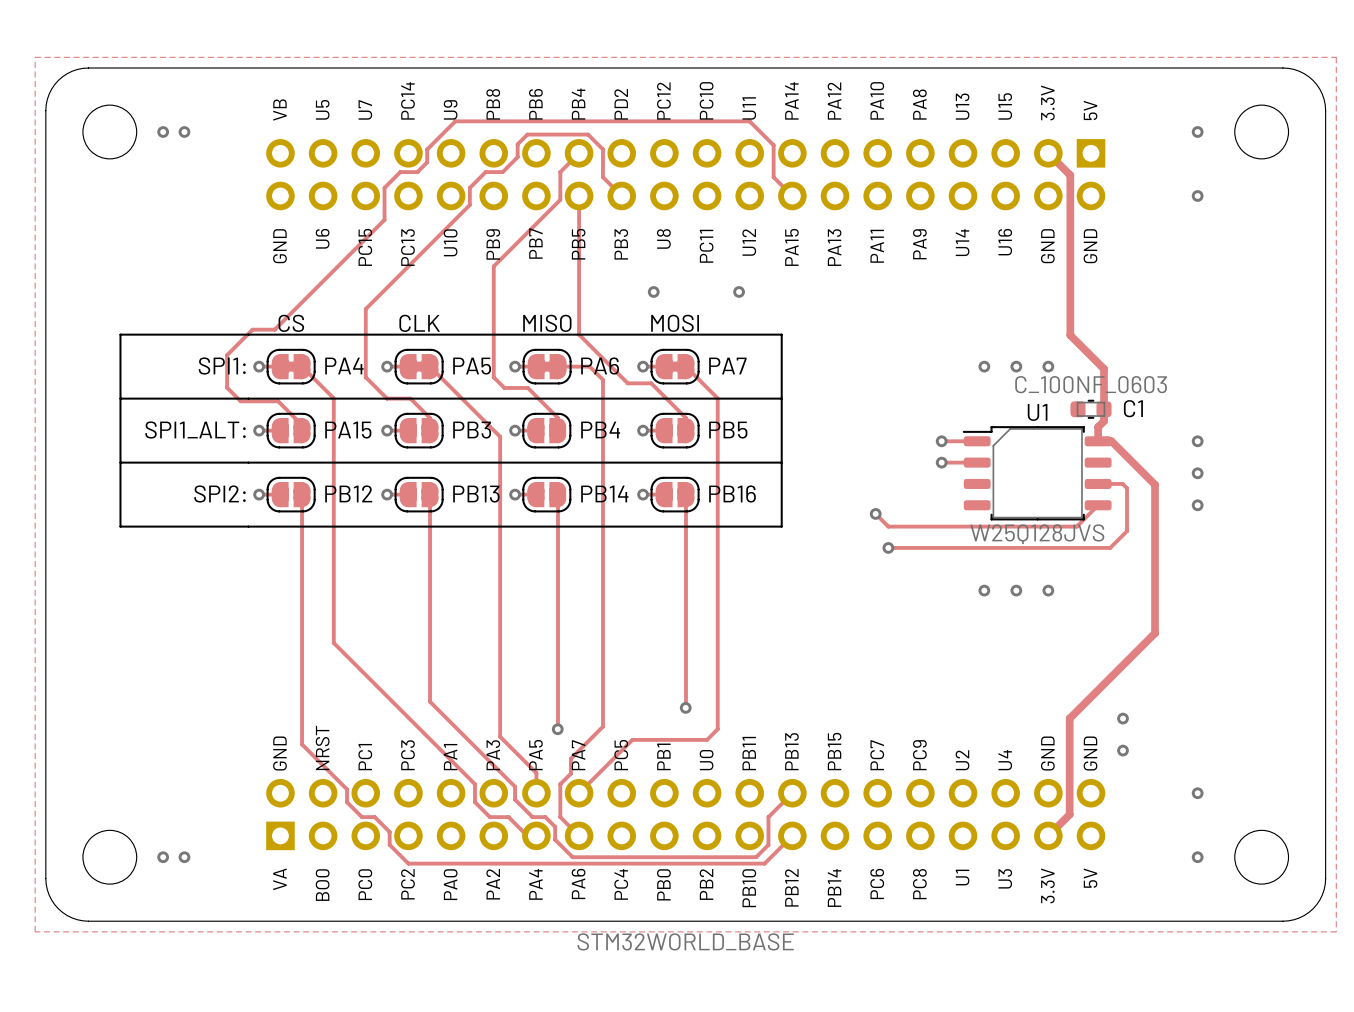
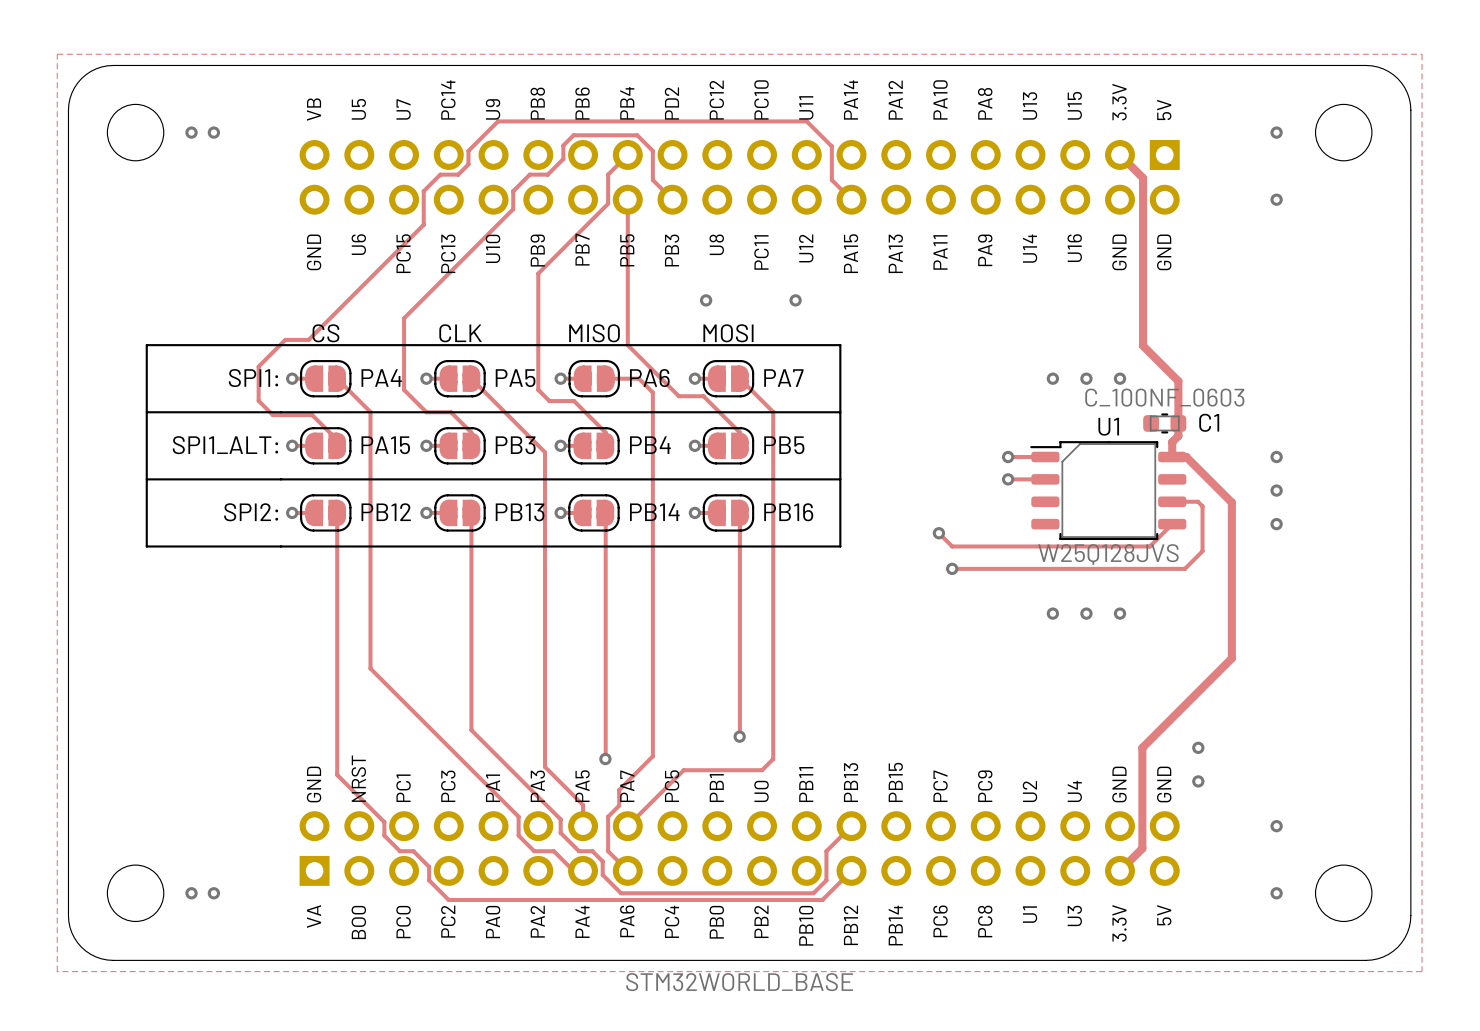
part footprint: [266, 348, 316, 385] -> [300, 360, 352, 398]
part footprint: [394, 348, 444, 385] -> [434, 360, 486, 398]
part footprint: [522, 348, 572, 385] -> [568, 360, 620, 398]
part footprint: [650, 348, 700, 385] -> [702, 360, 755, 398]

